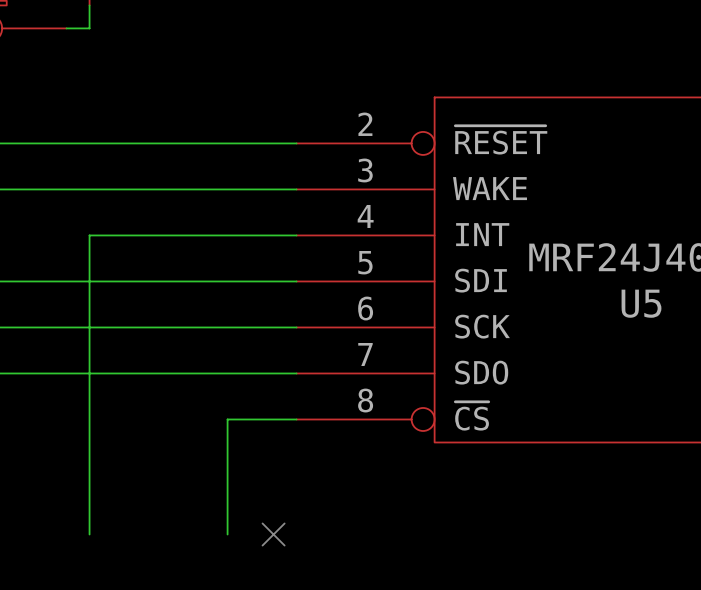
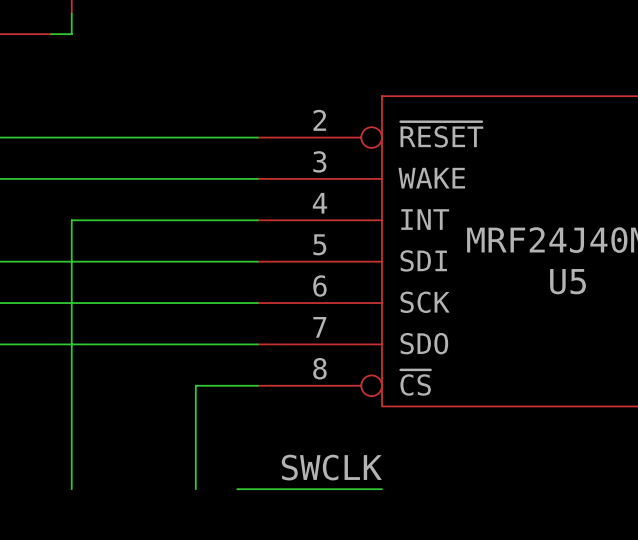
label: none -> SWCLK (331, 467)
wire: none -> (237, 489) (381, 489)
no-connect mark: (273, 534) -> none

